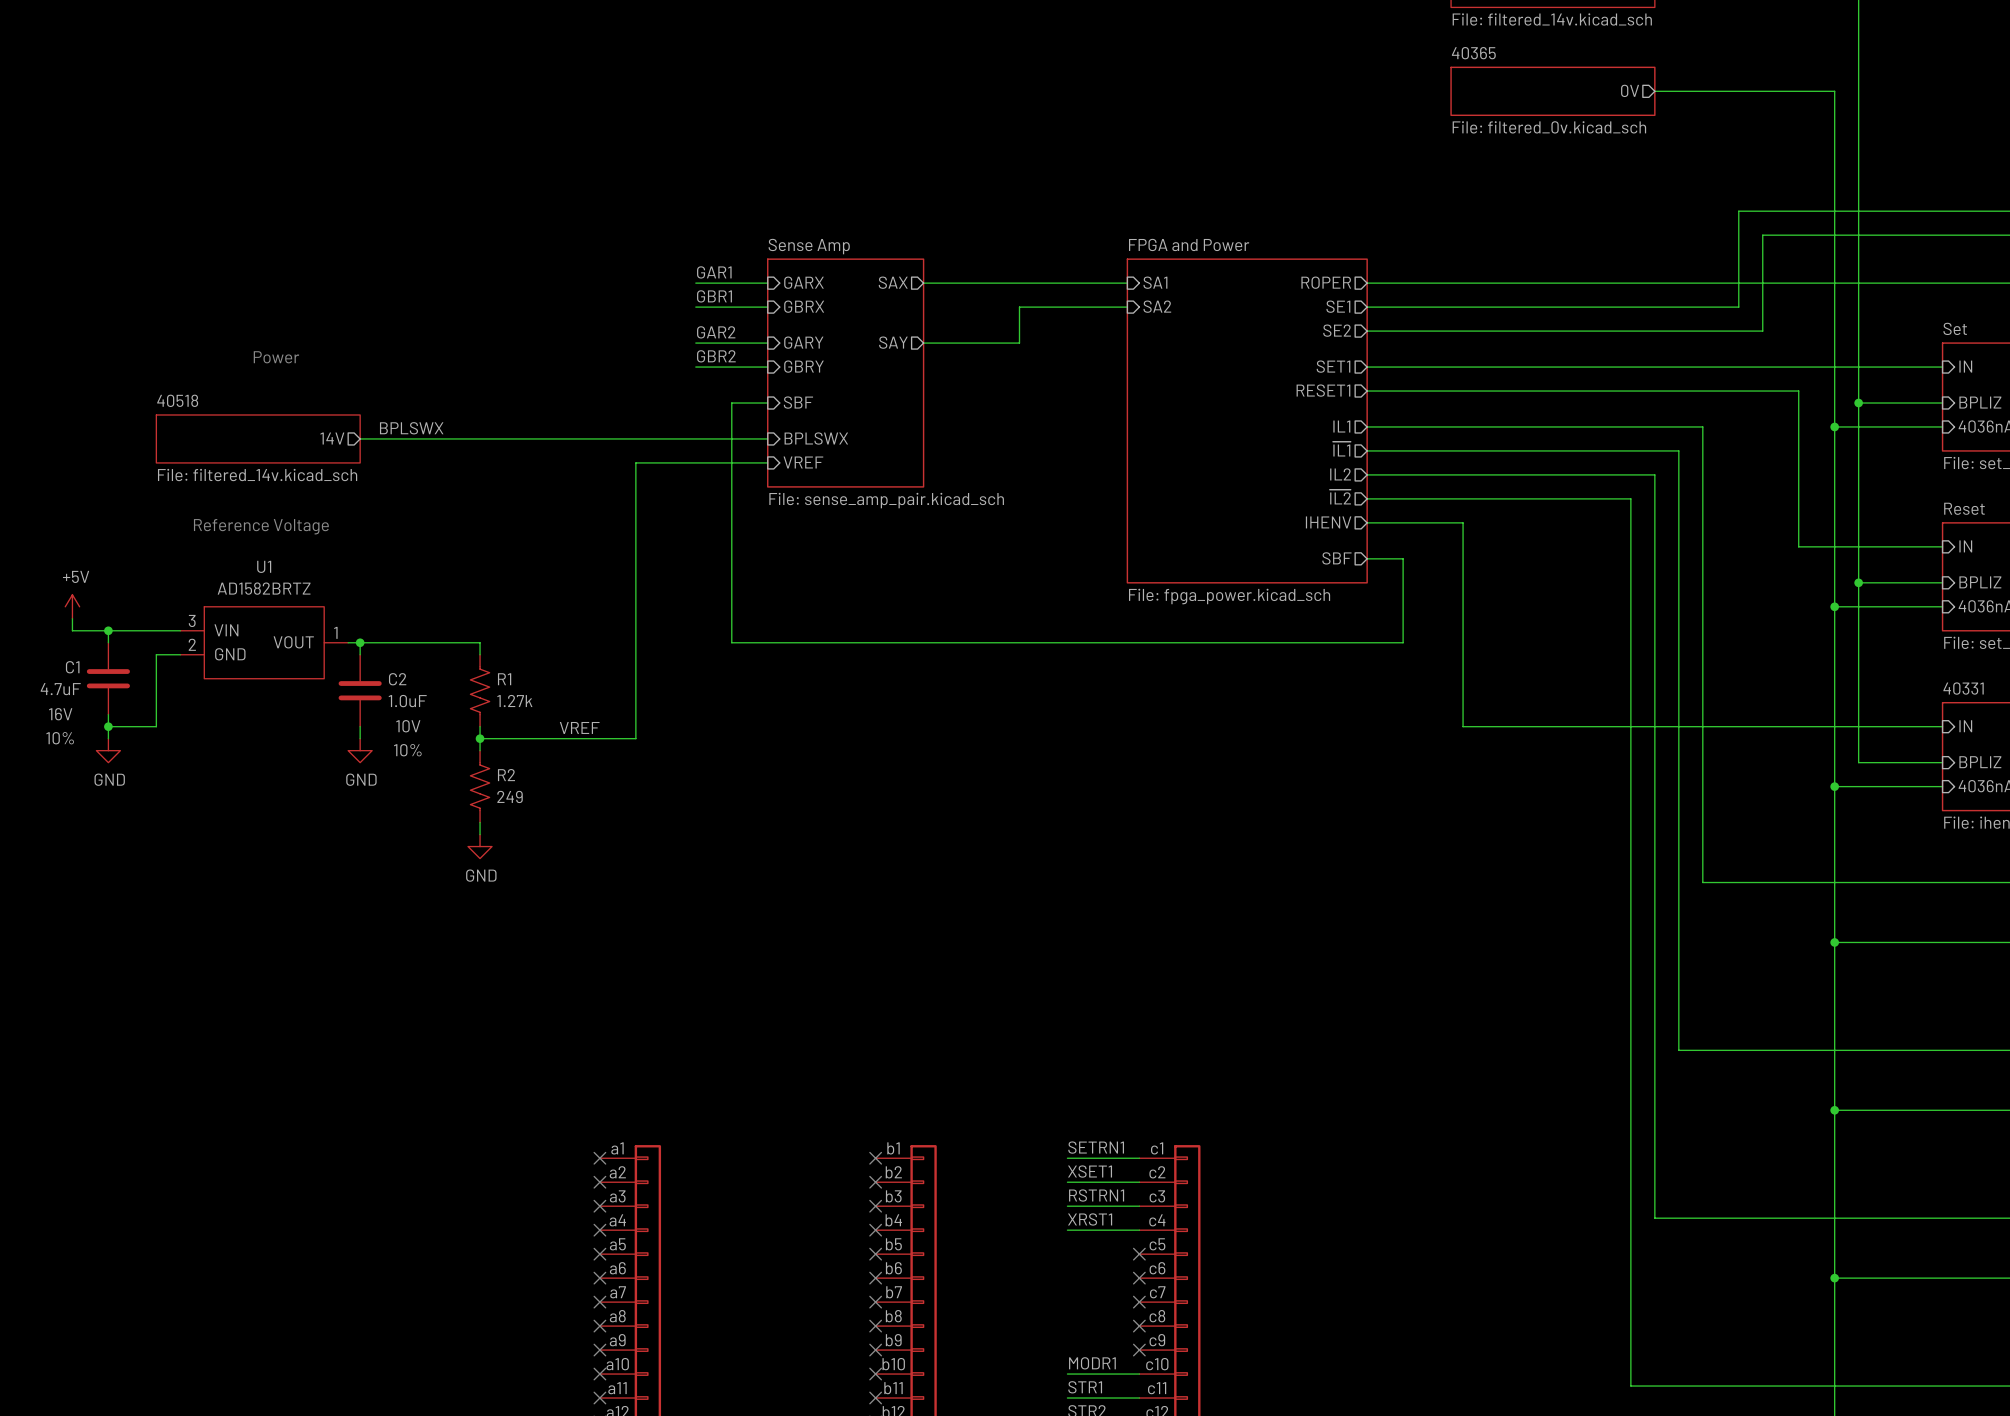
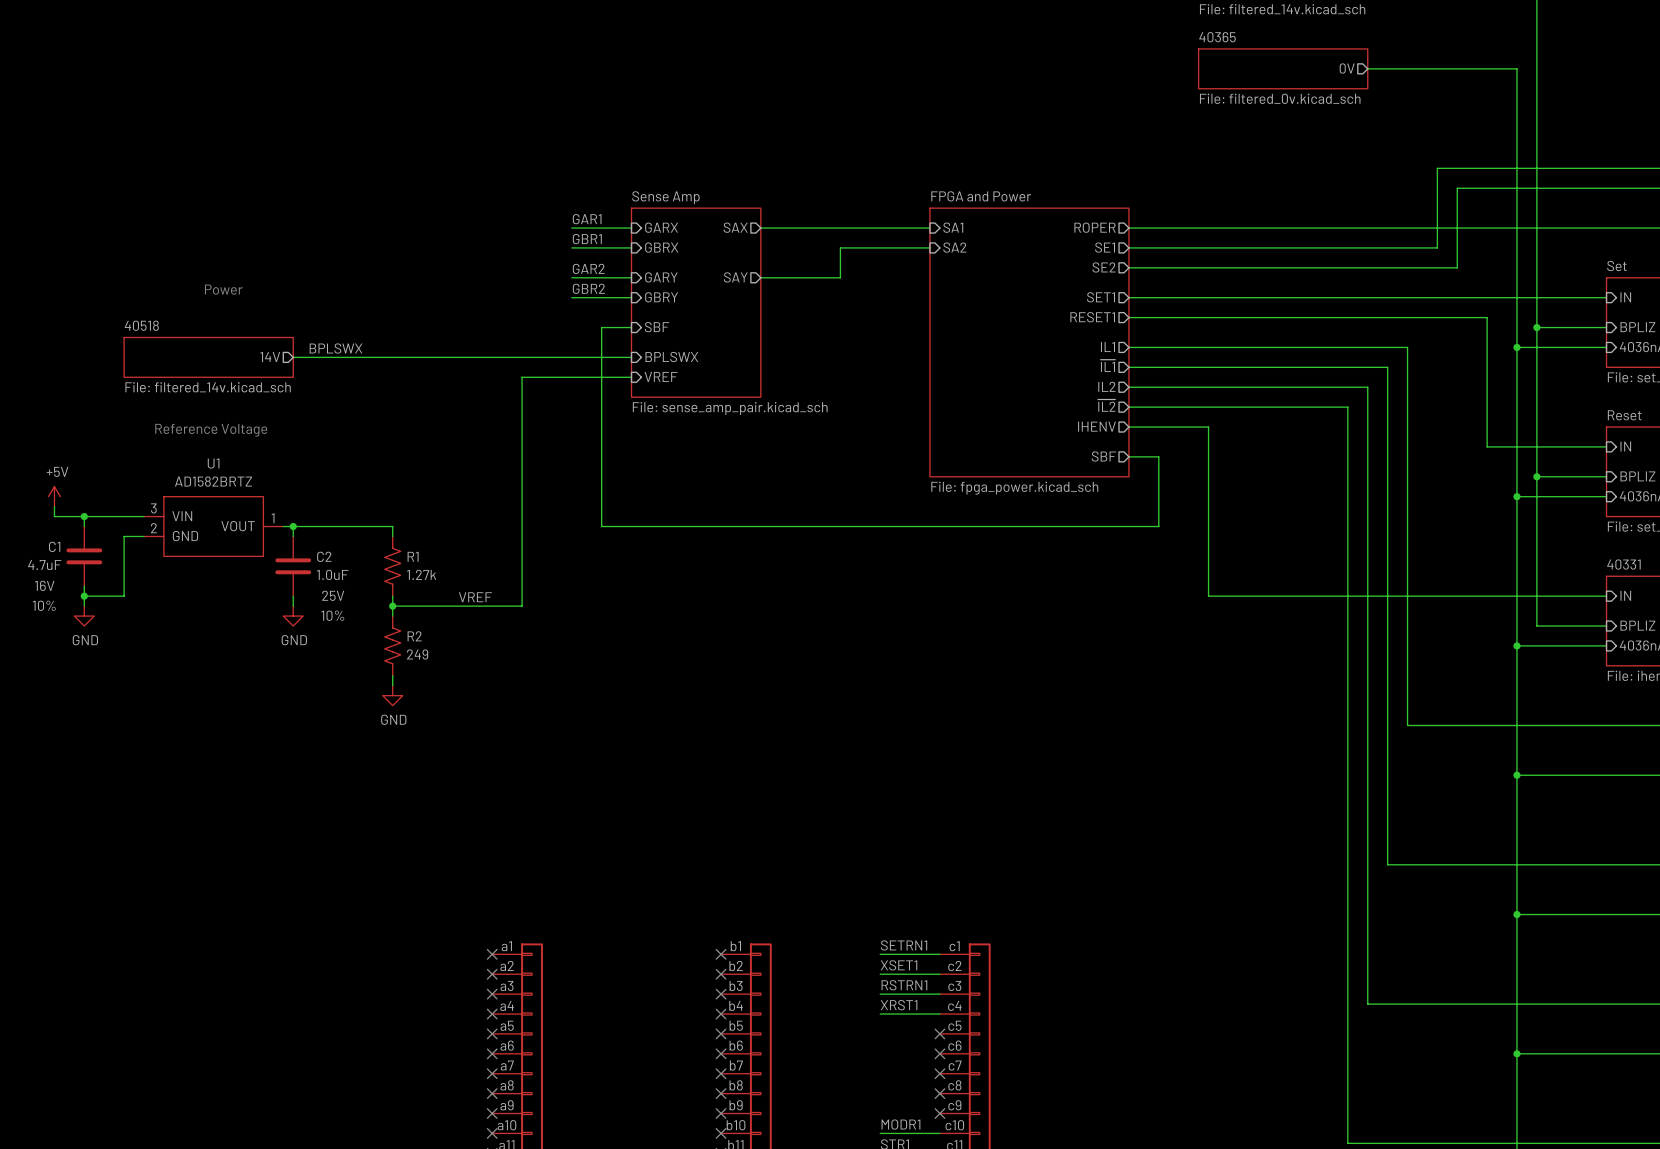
C2 text: 10V (408, 726) -> 25V (333, 595)

